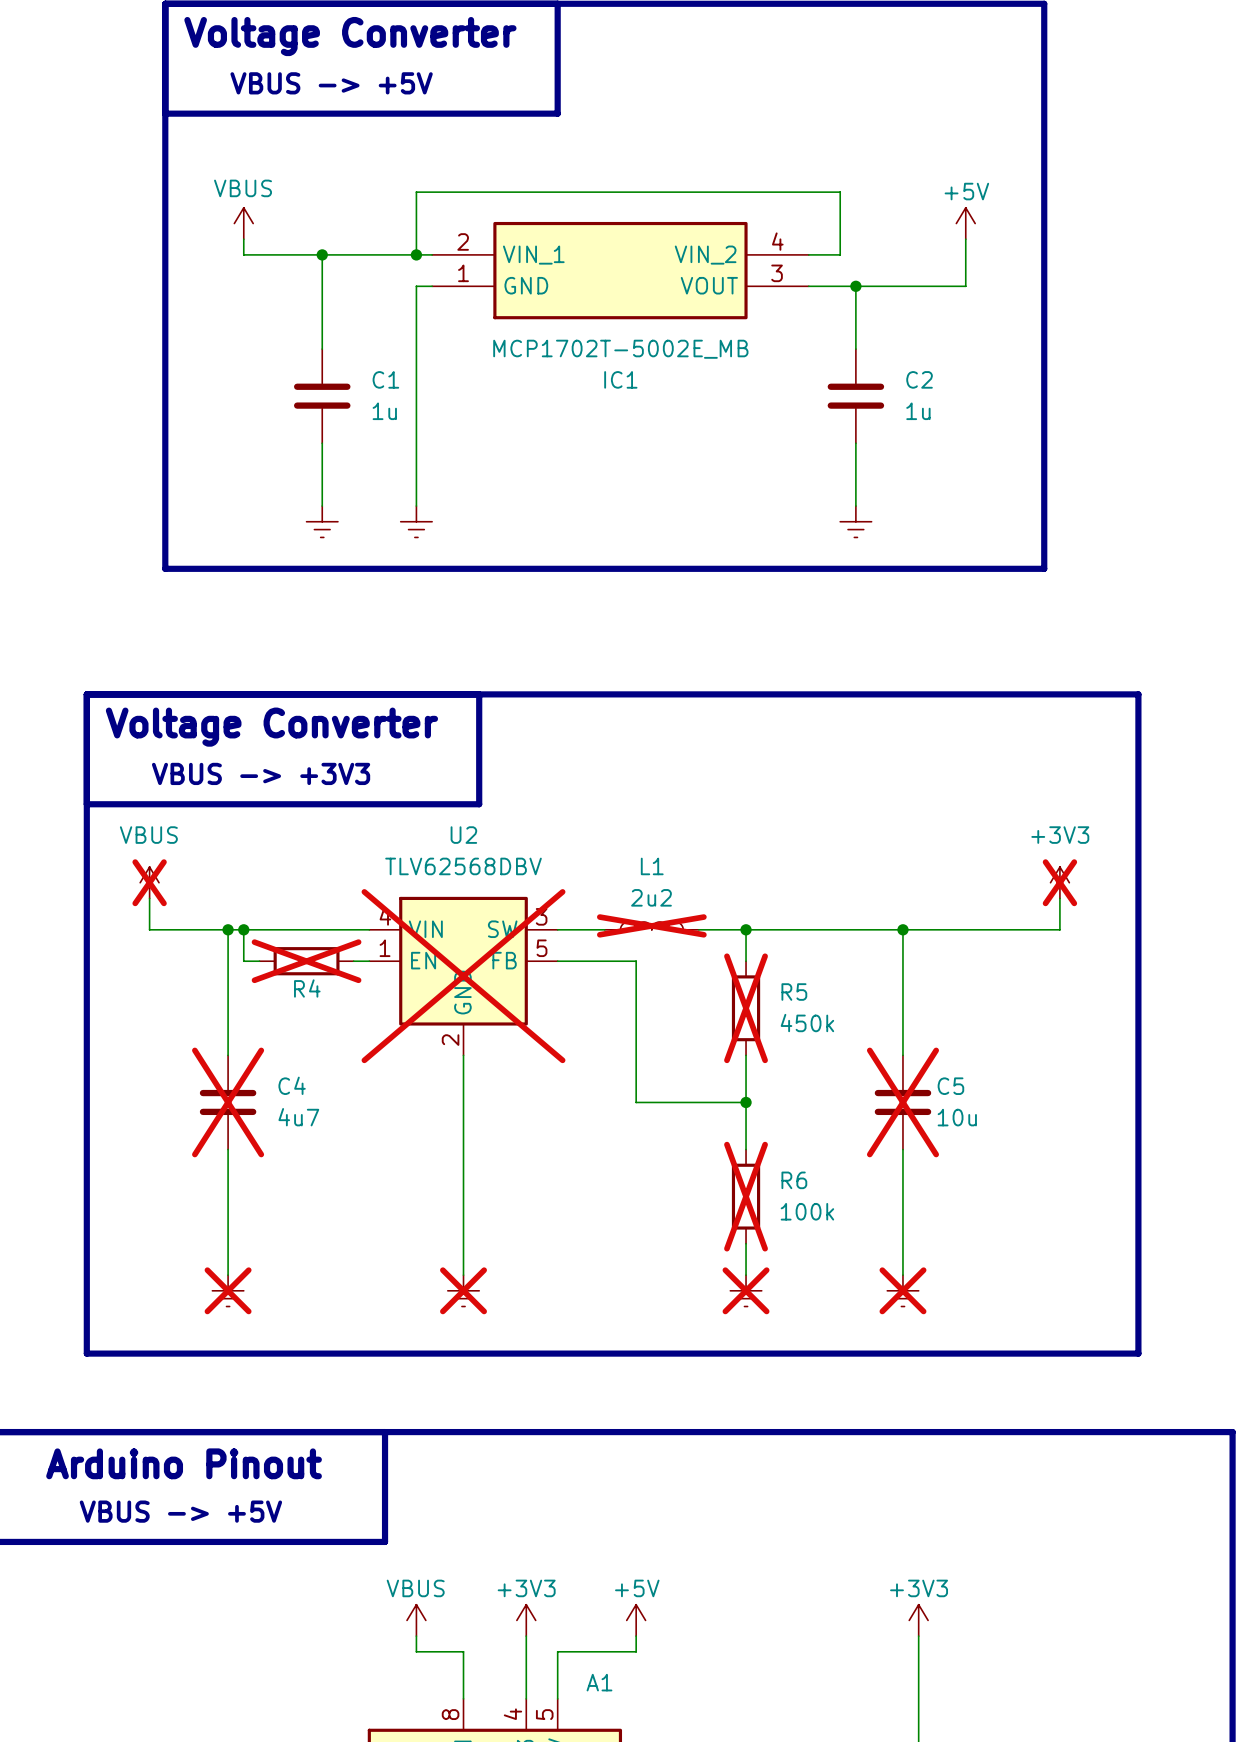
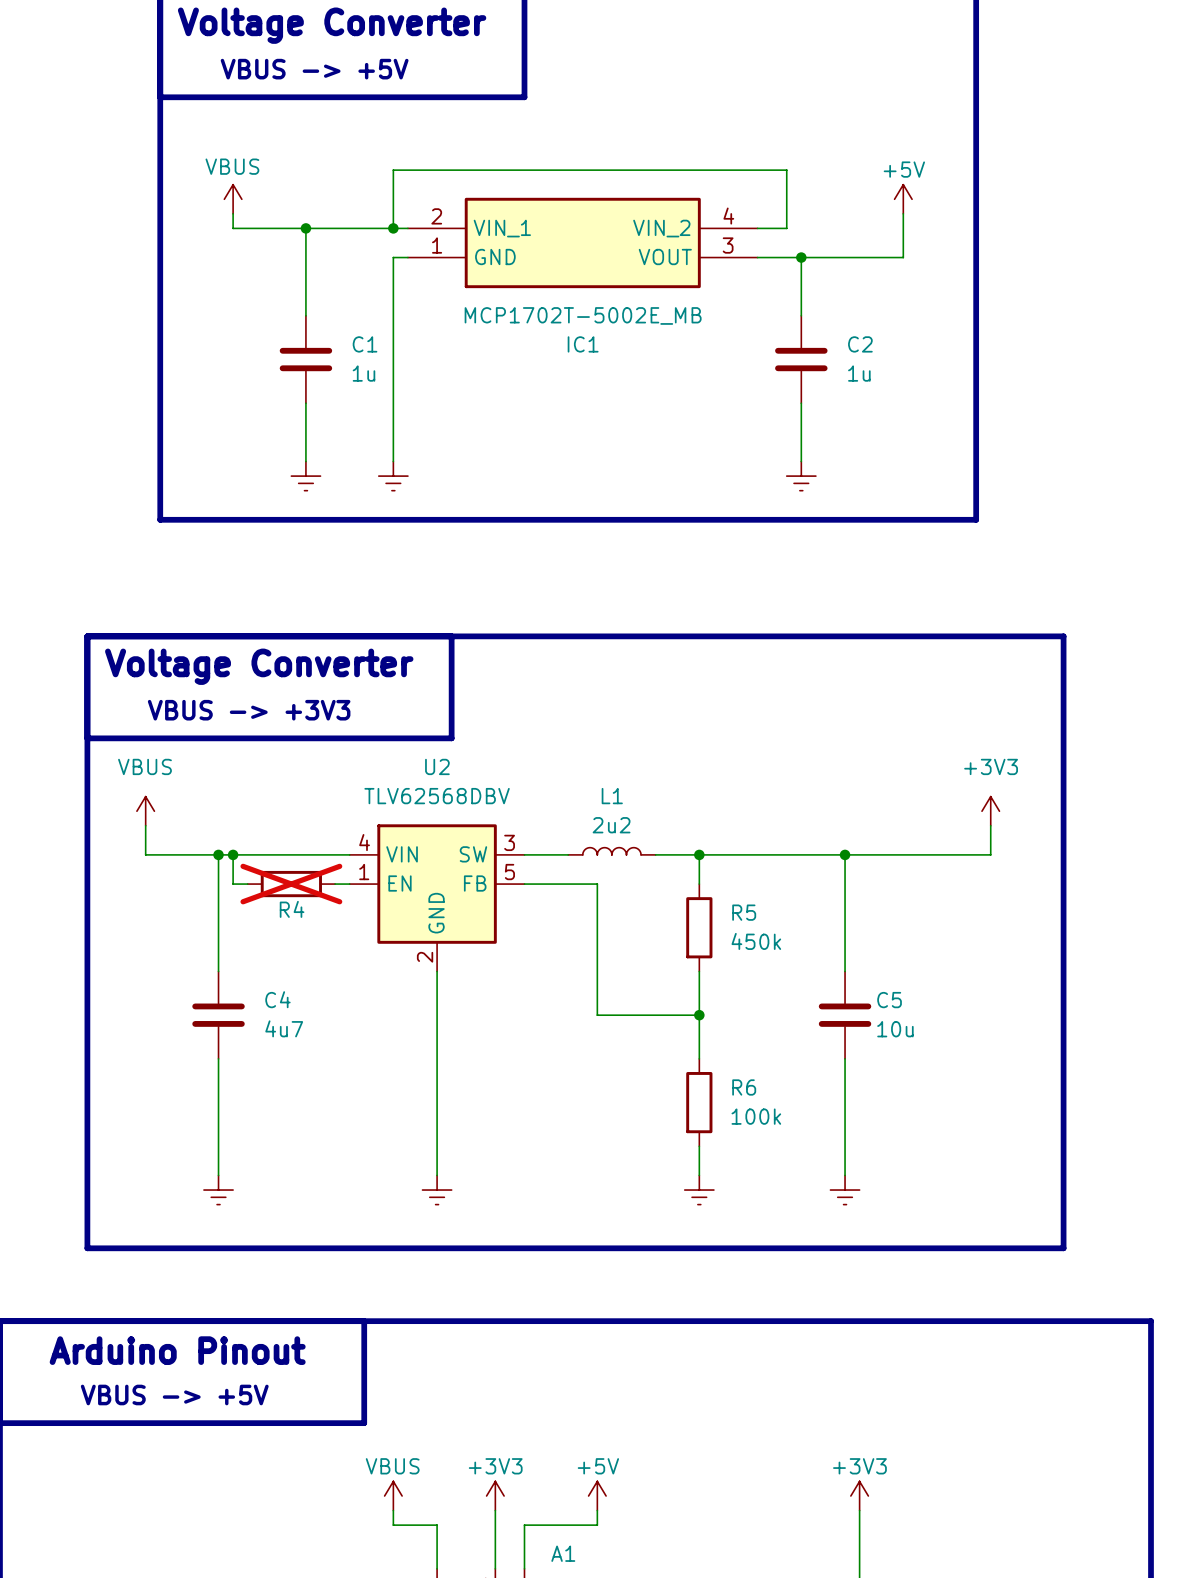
power symbol do-not-place cross: (149, 882) -> none
power symbol do-not-place cross: (1059, 882) -> none
L1 do-not-place cross: (651, 925) -> none
U2 do-not-place cross: (463, 976) -> none
R5 do-not-place cross: (746, 1008) -> none
C4 do-not-place cross: (228, 1102) -> none
C5 do-not-place cross: (902, 1102) -> none
R6 do-not-place cross: (746, 1196) -> none
power symbol do-not-place cross: (228, 1290) -> none
power symbol do-not-place cross: (463, 1290) -> none
power symbol do-not-place cross: (746, 1290) -> none
power symbol do-not-place cross: (902, 1290) -> none

